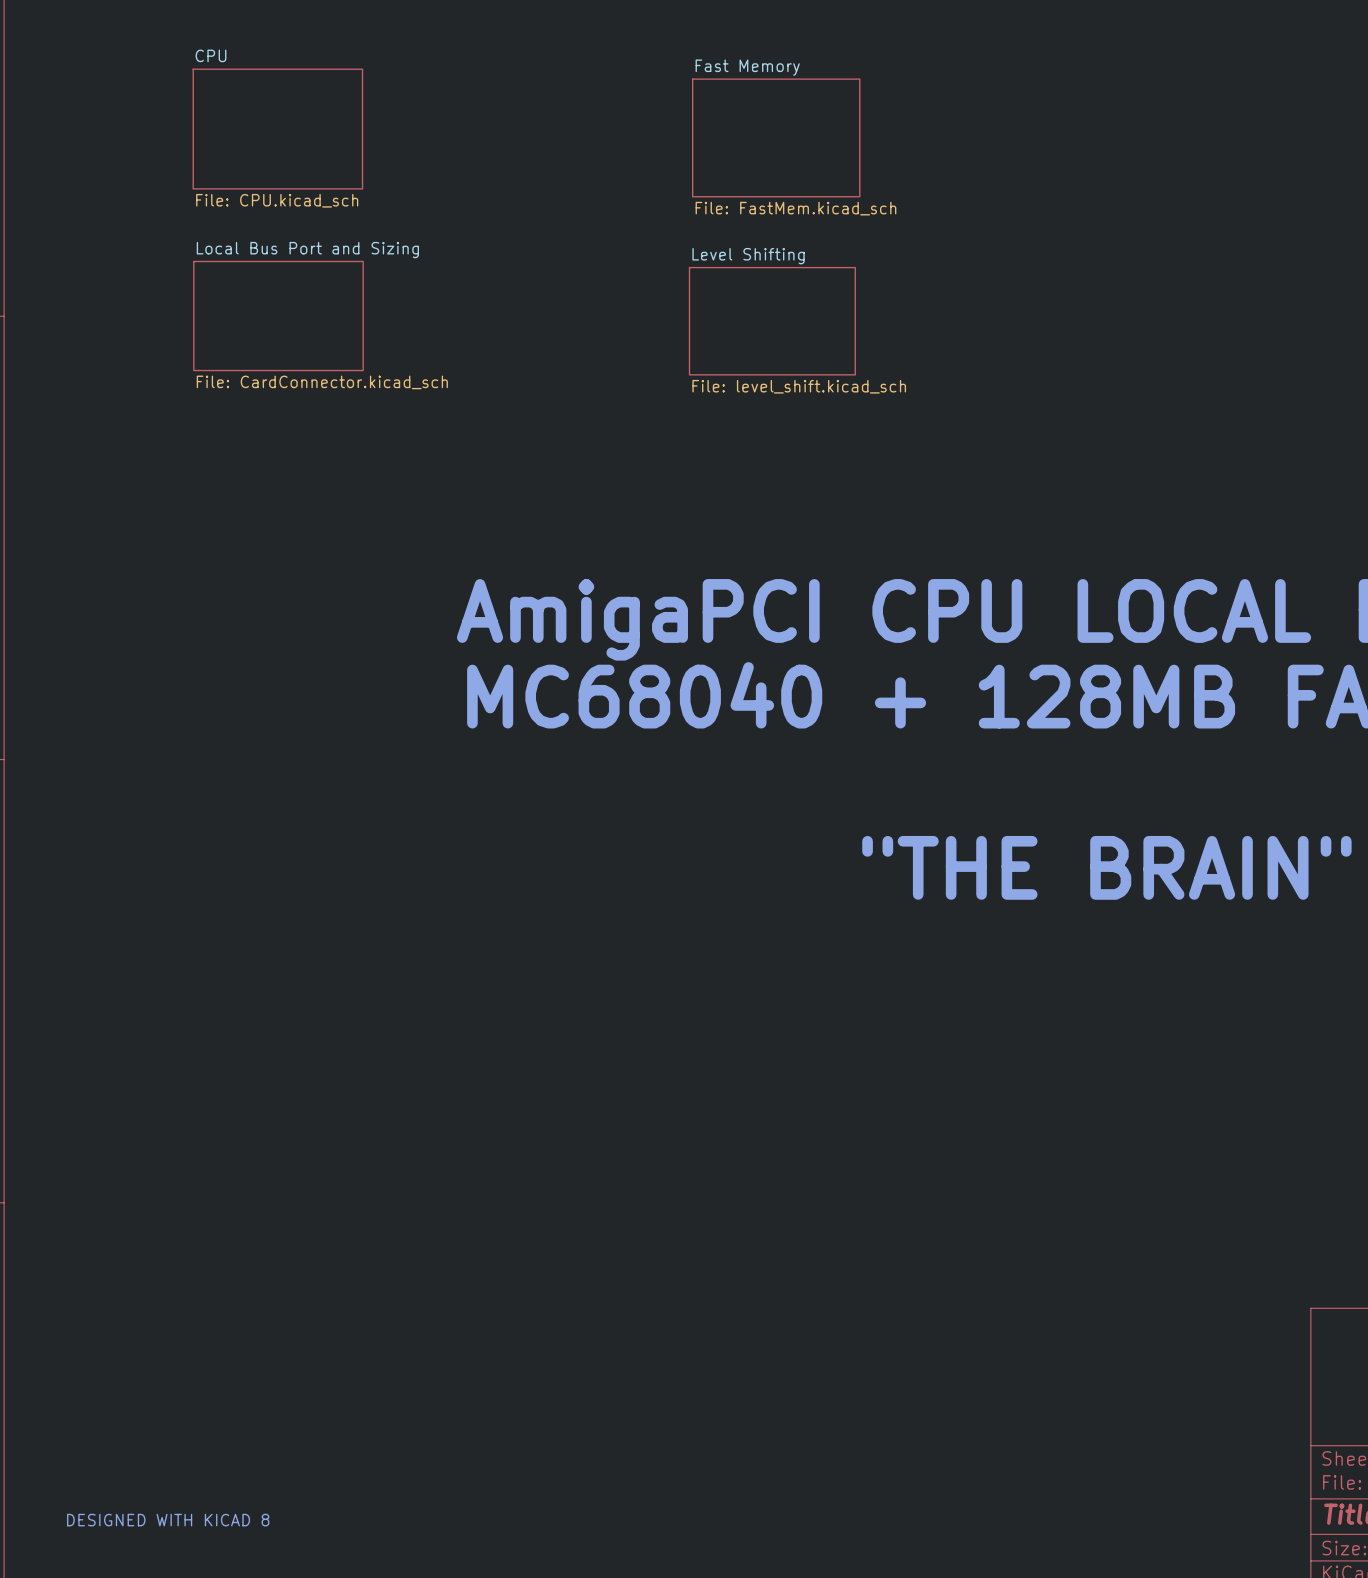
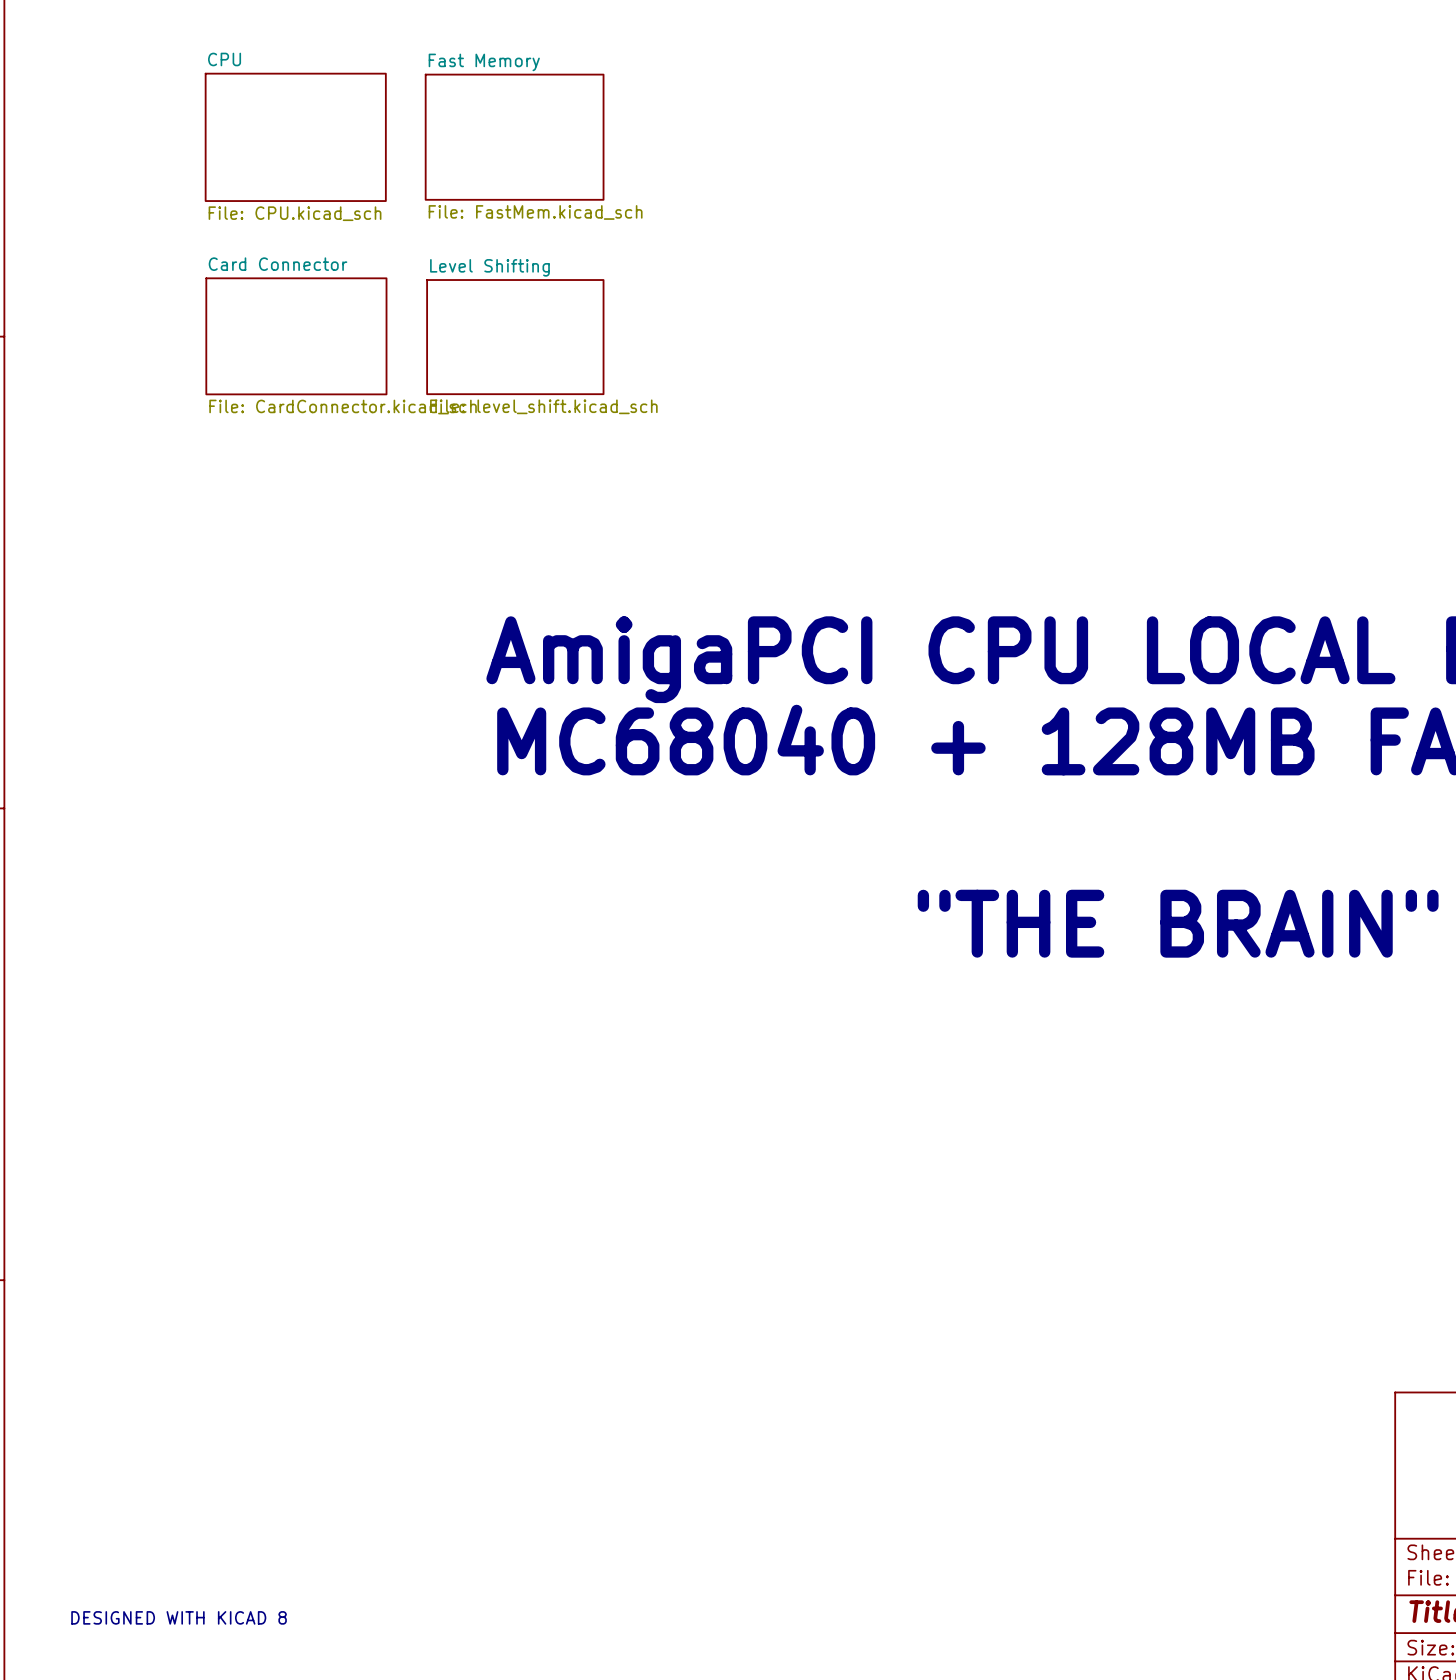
sheet Fast Memory: none -> File: FastMem.kicad_sch (514, 137)
sheet Fast Memory: File: FastMem.kicad_sch (776, 137) -> none
sheet Local Bus Port and Sizing name: Local Bus Port and Sizing (307, 250) -> Card Connector (278, 264)
sheet Level Shifting: none -> File: level_shift.kicad_sch (515, 337)
sheet Level Shifting: File: level_shift.kicad_sch (772, 321) -> none

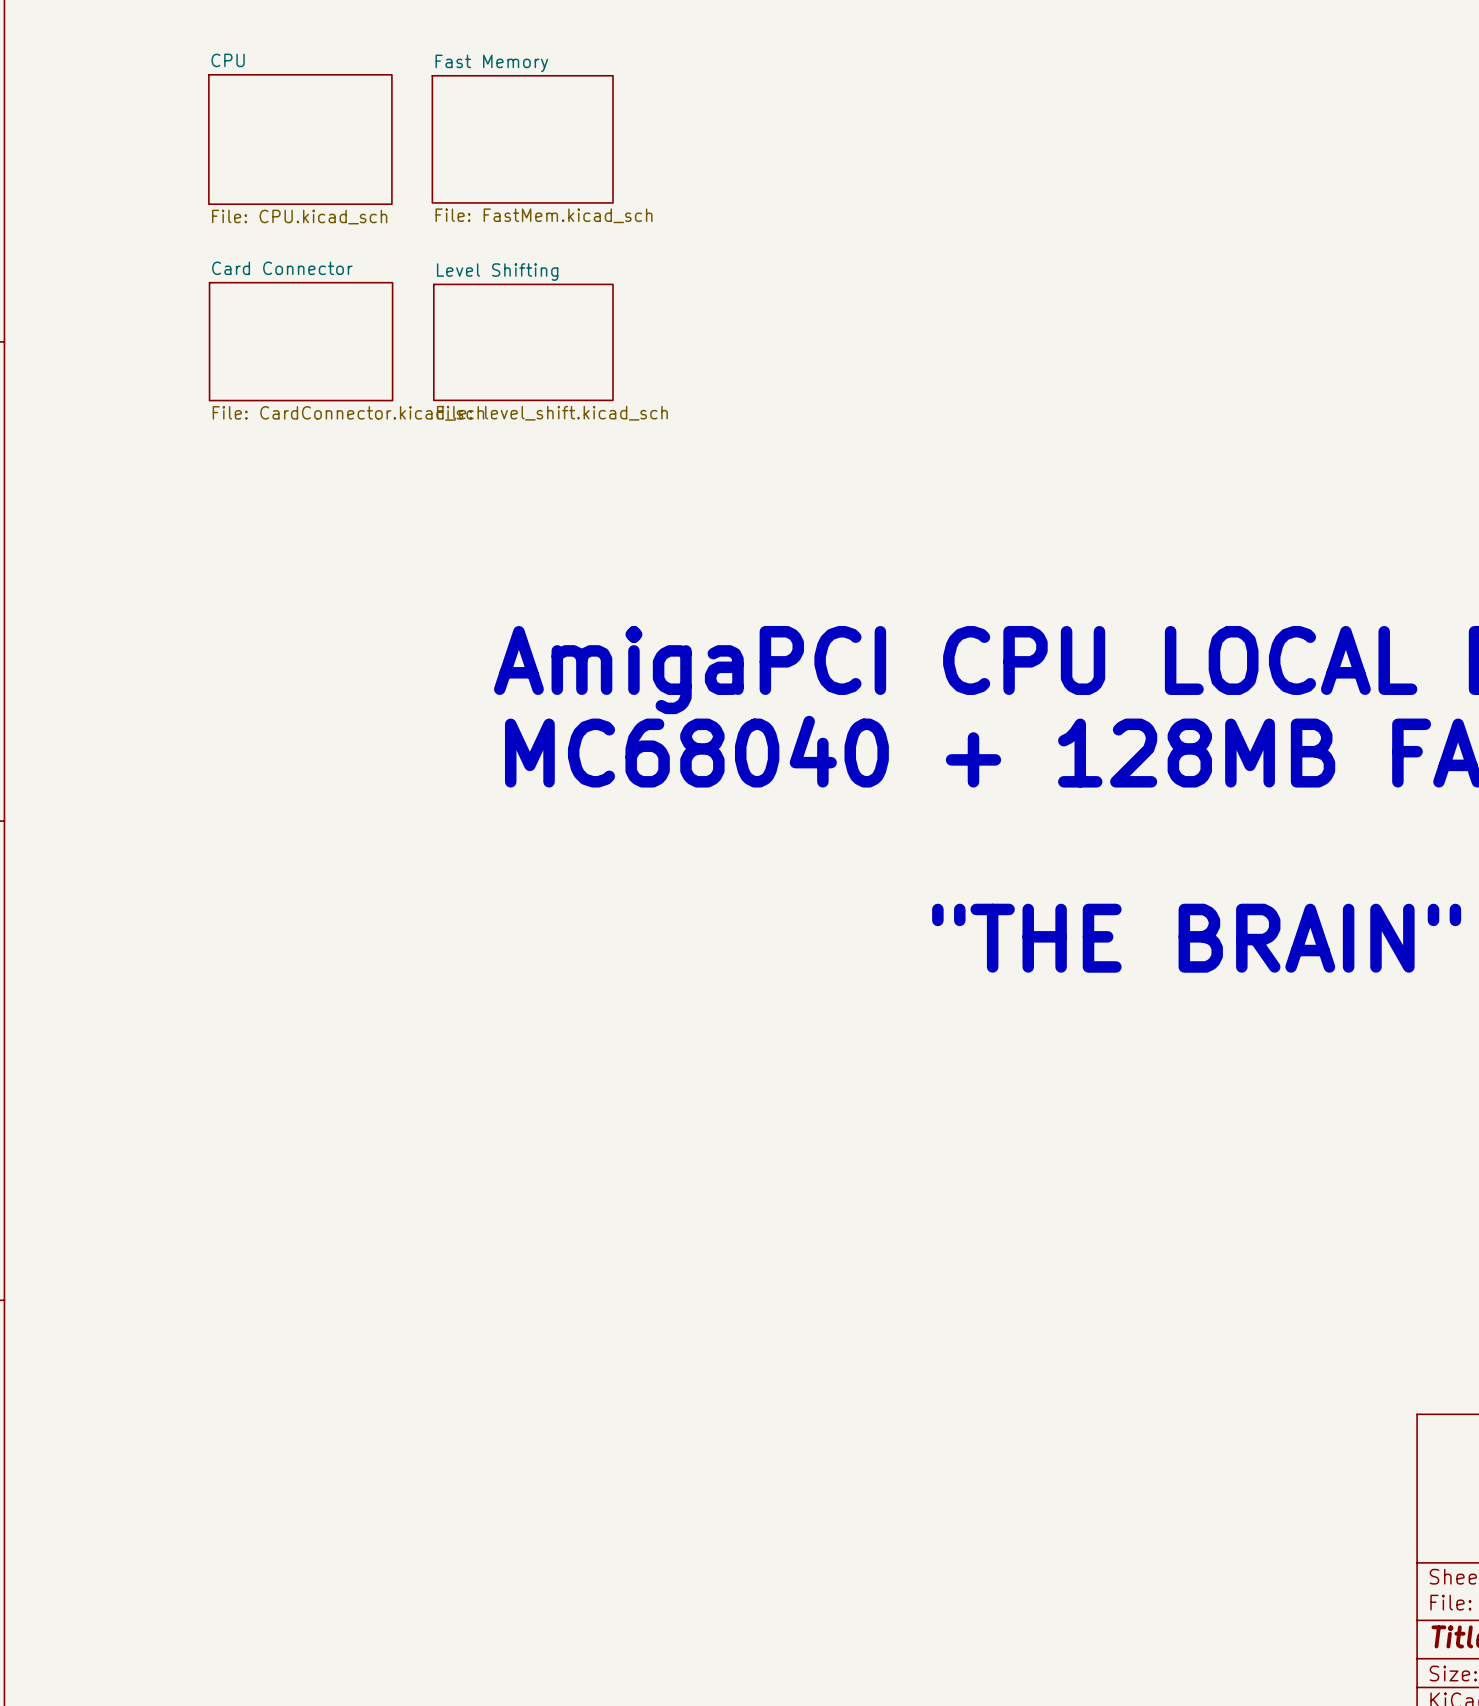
text: DESIGNED WITH KICAD 8 (179, 1617) -> none

